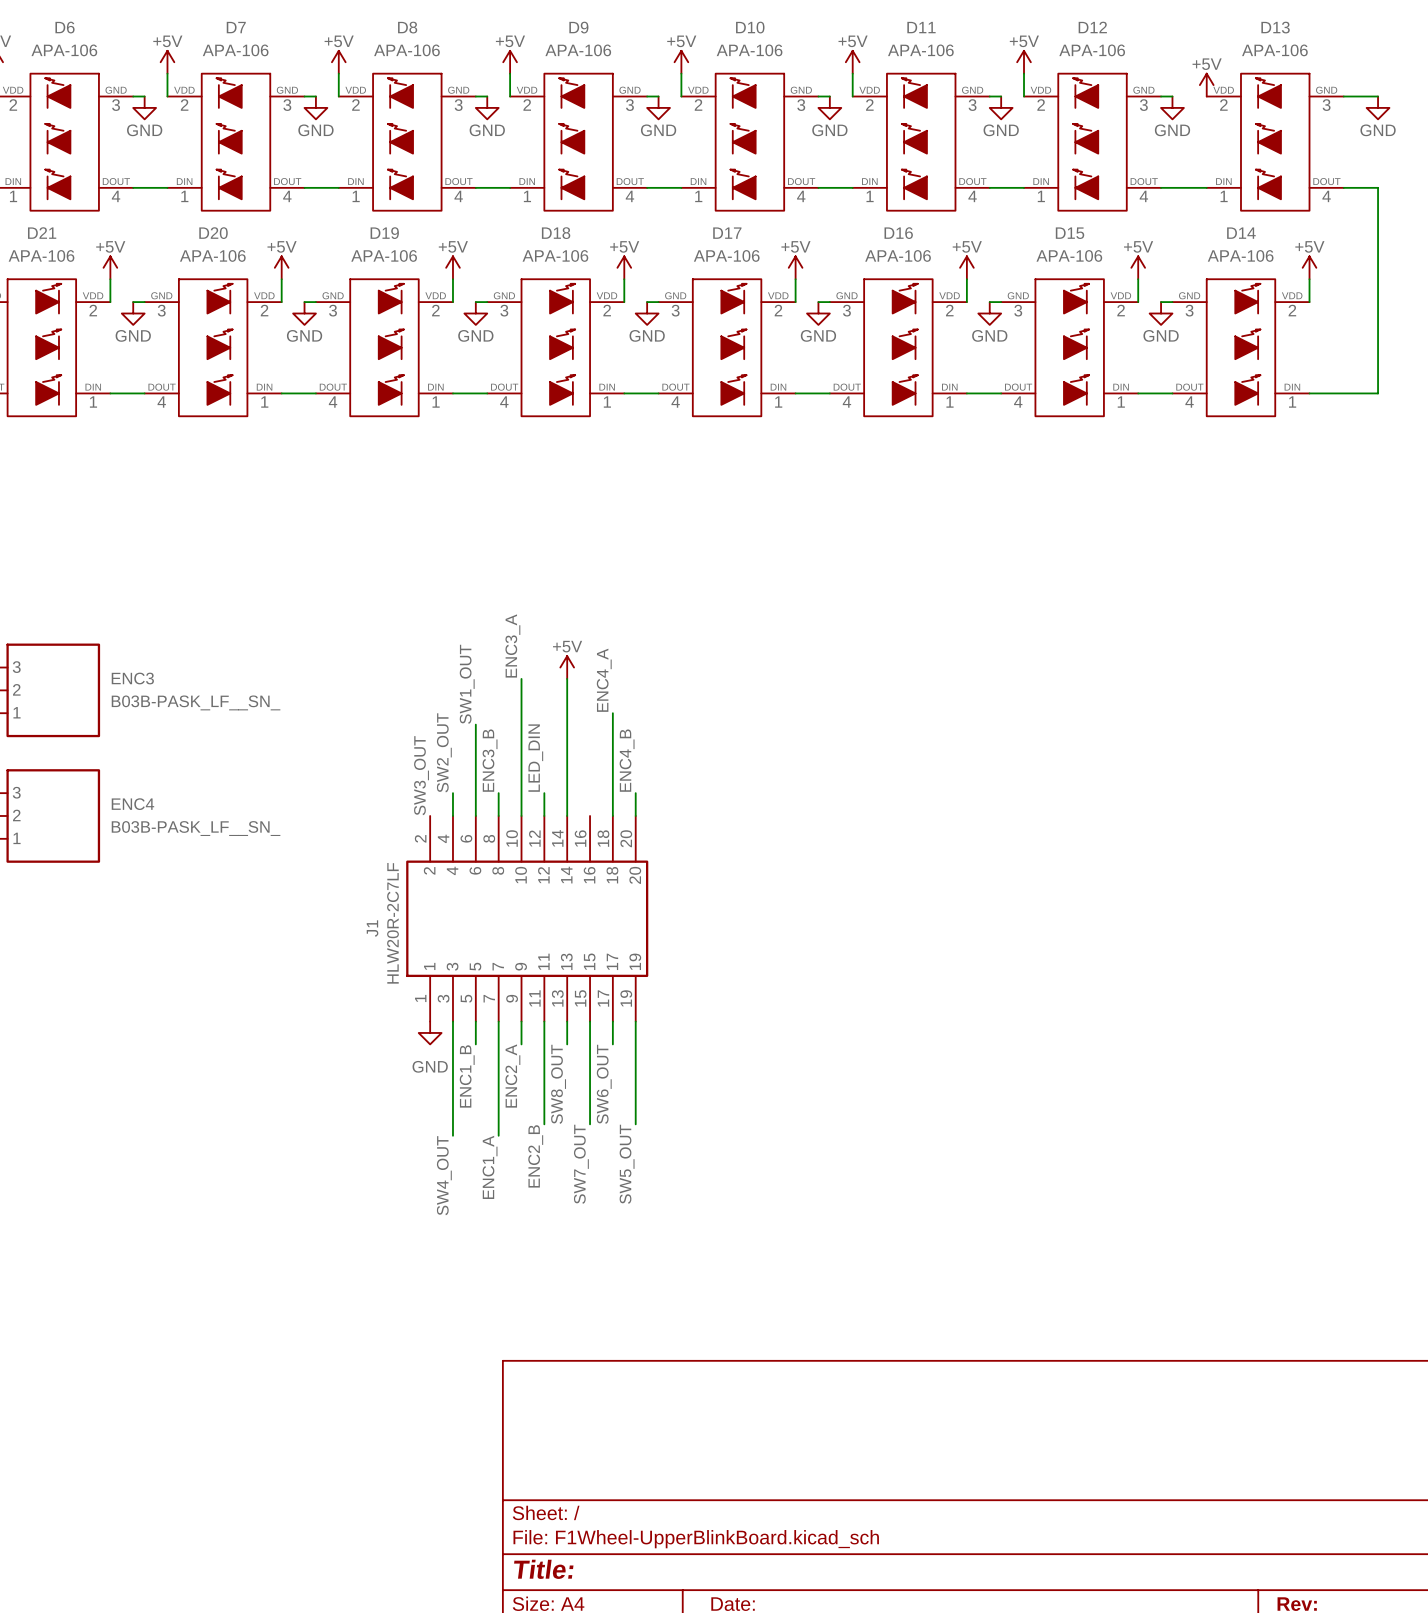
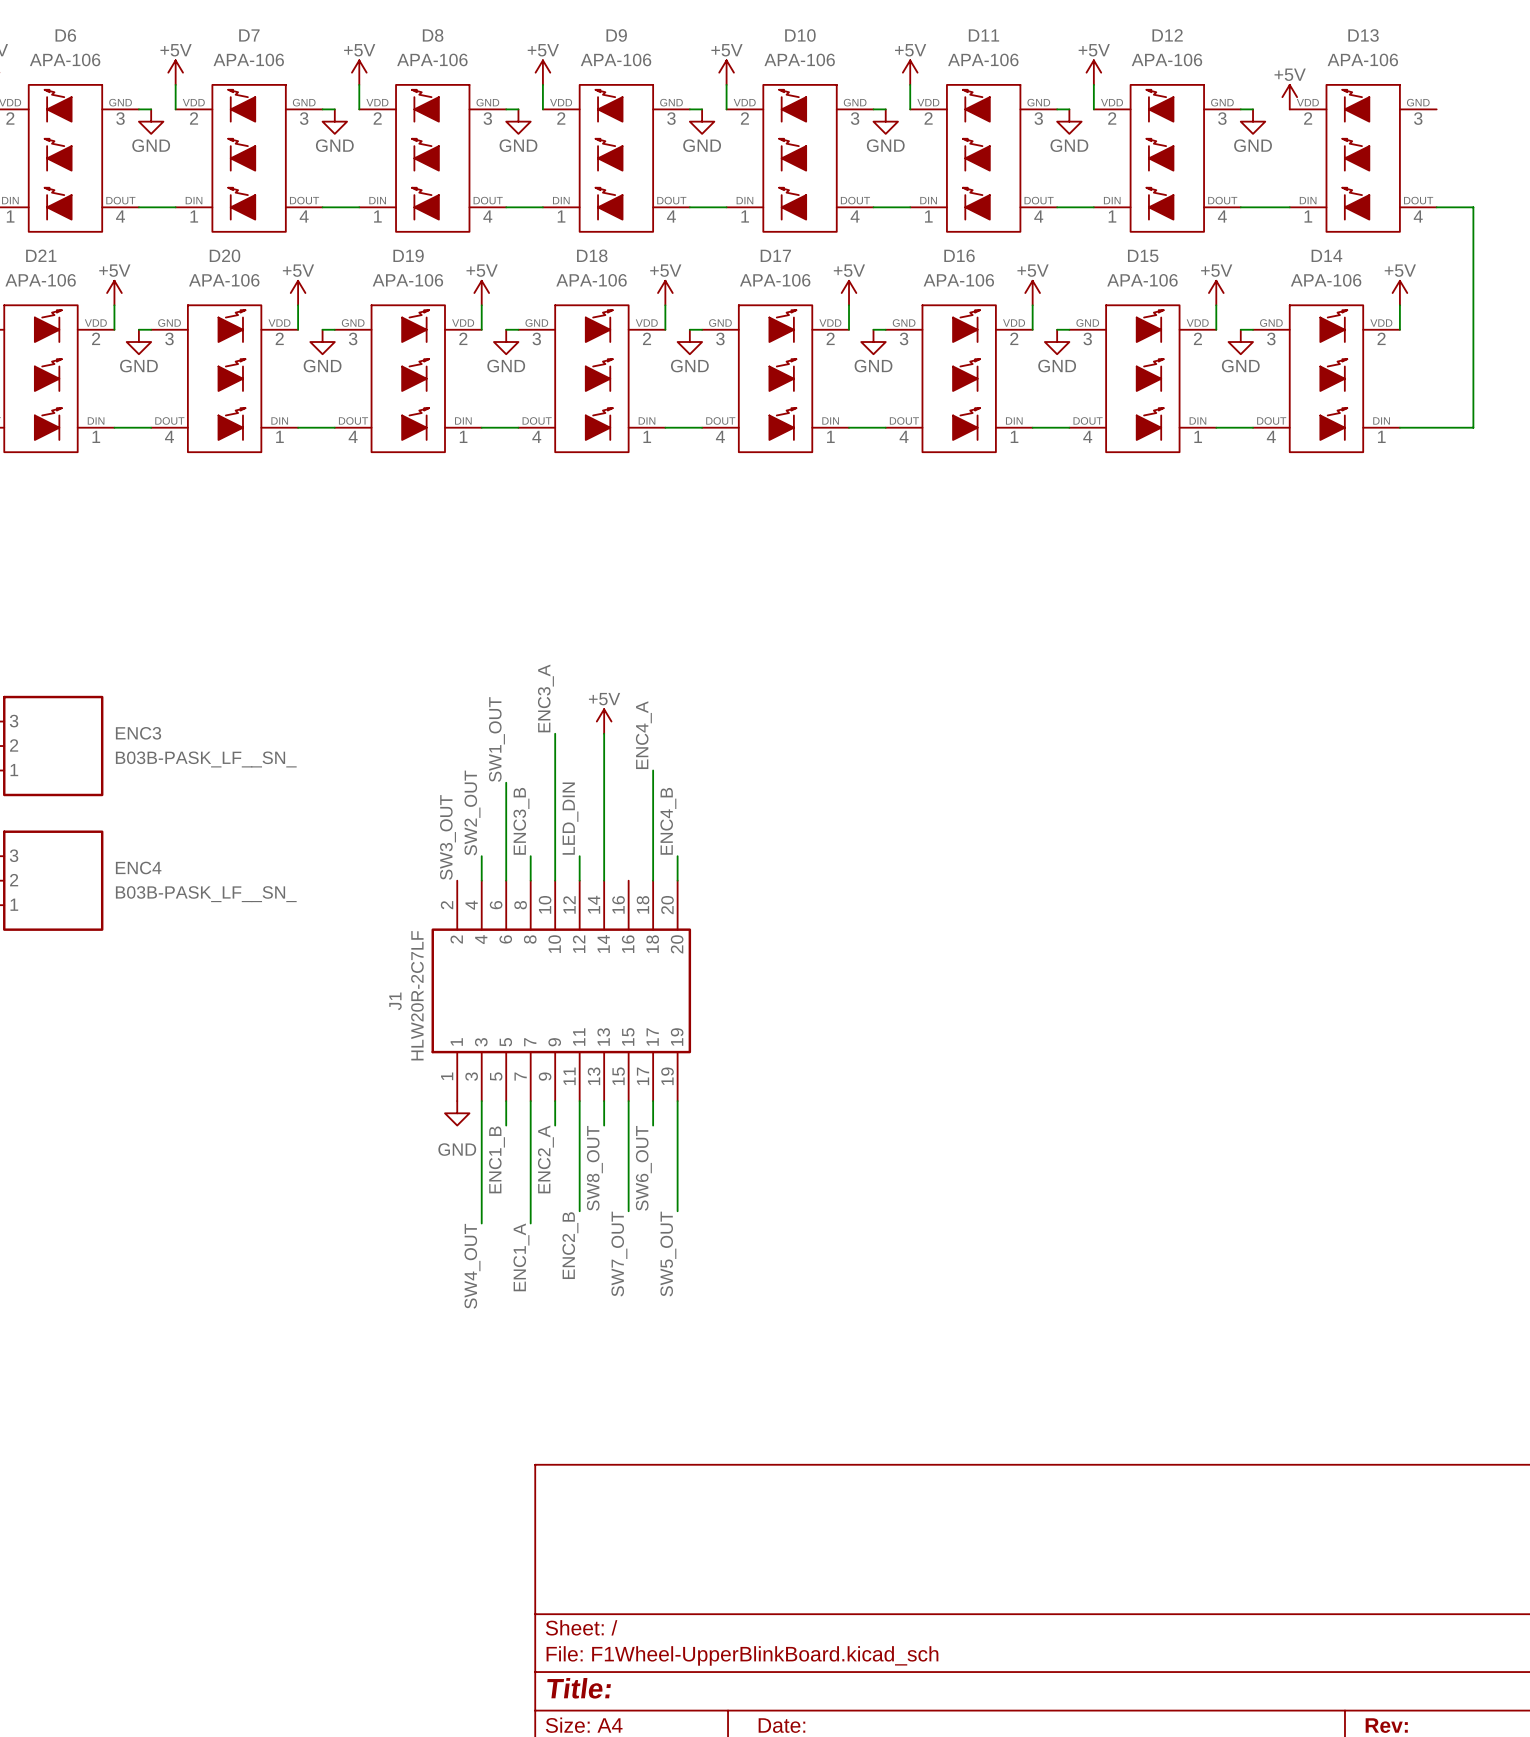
wire: (1343, 96) (1378, 96) -> none
power symbol: GND (1378, 107) -> none

